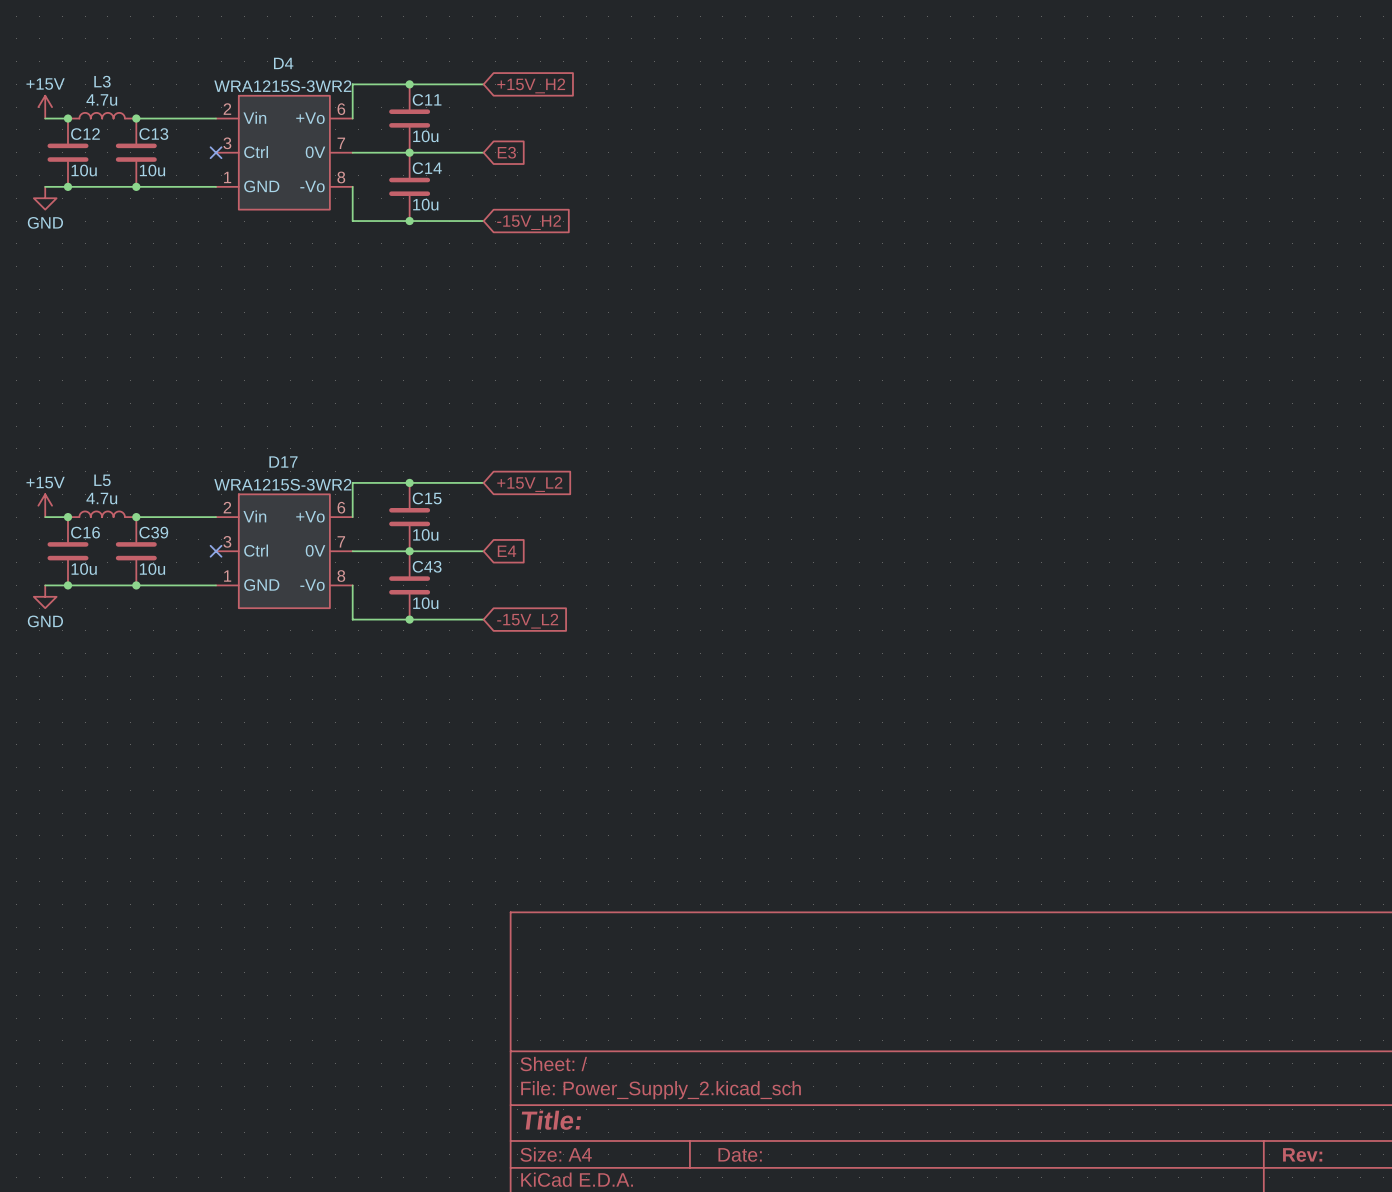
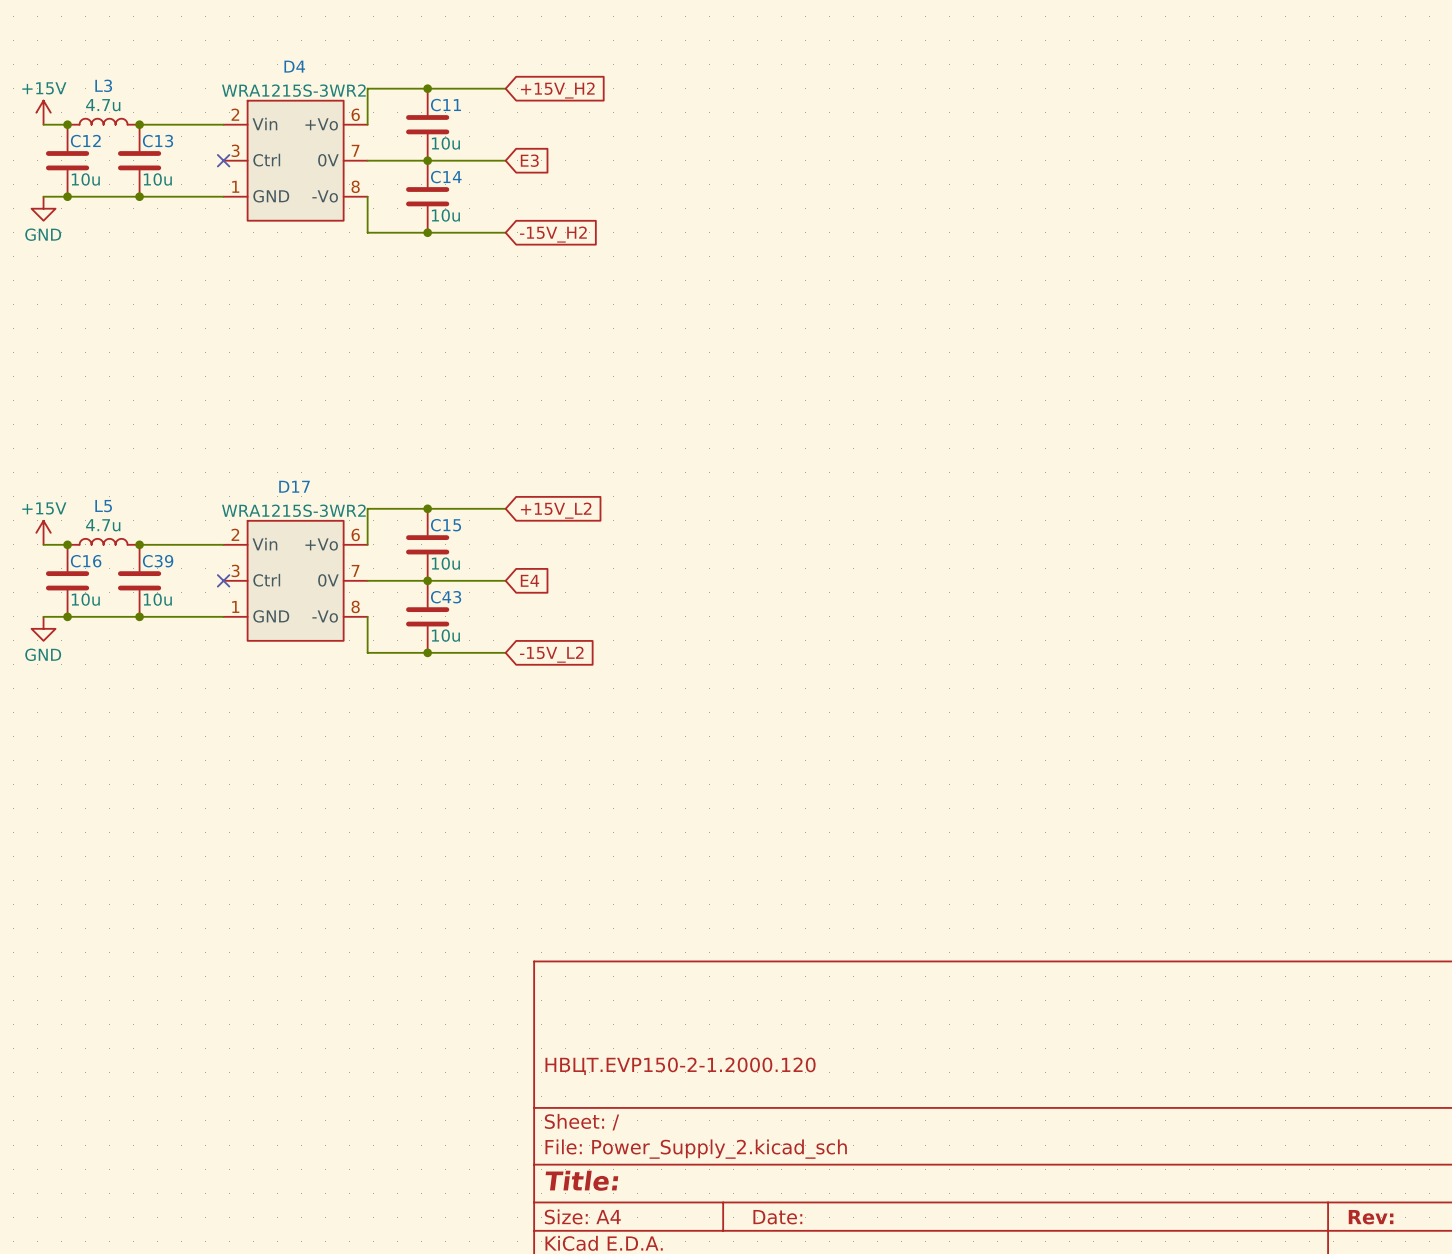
title block: none -> НВЦТ.EVP150-2-1.2000.120 (680, 1066)

